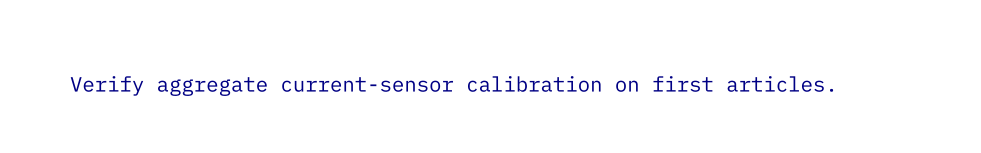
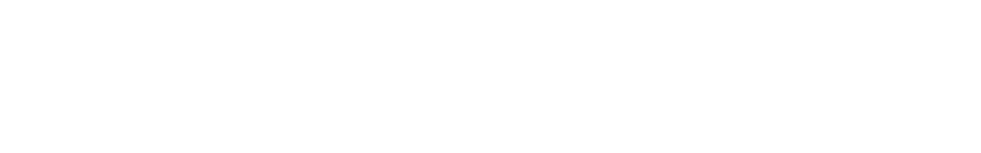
text: Verify aggregate current-sensor calibration on first articles. (451, 86) -> none

